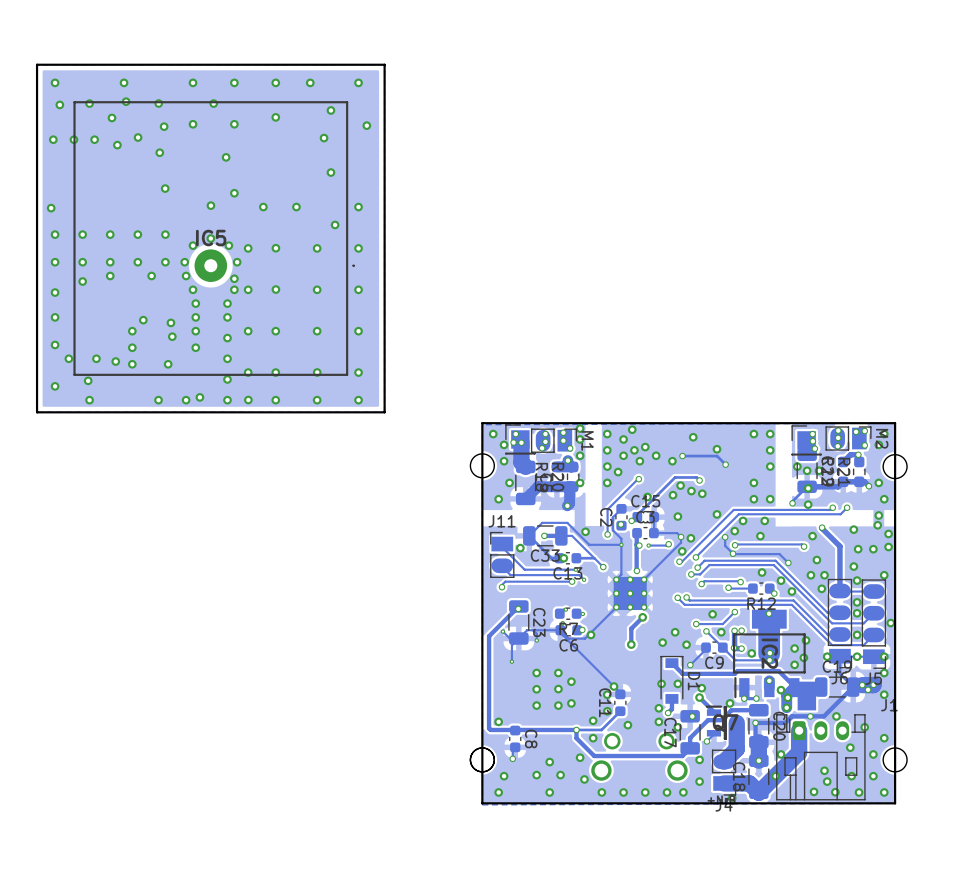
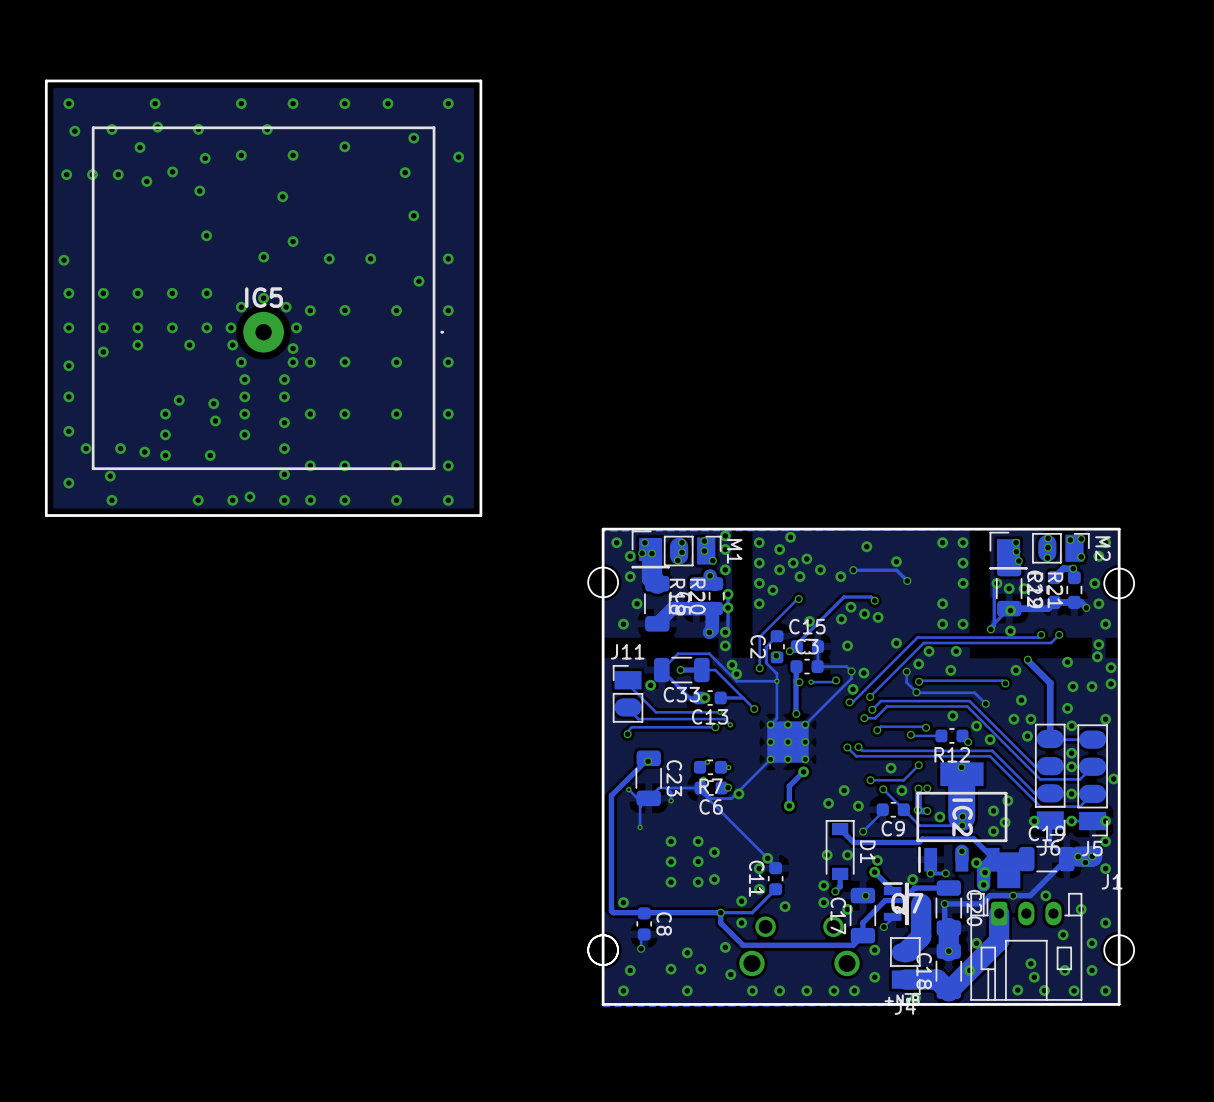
via: none -> (1094, 583)
track: none -> (994, 588) (994, 625) (990, 629)
track: none -> (728, 594) (728, 629) (725, 632)
via: none -> (728, 594)
via: (580, 482) -> none
via: none -> (728, 607)
via: none -> (725, 632)
via: none -> (725, 645)
via: none -> (736, 674)

